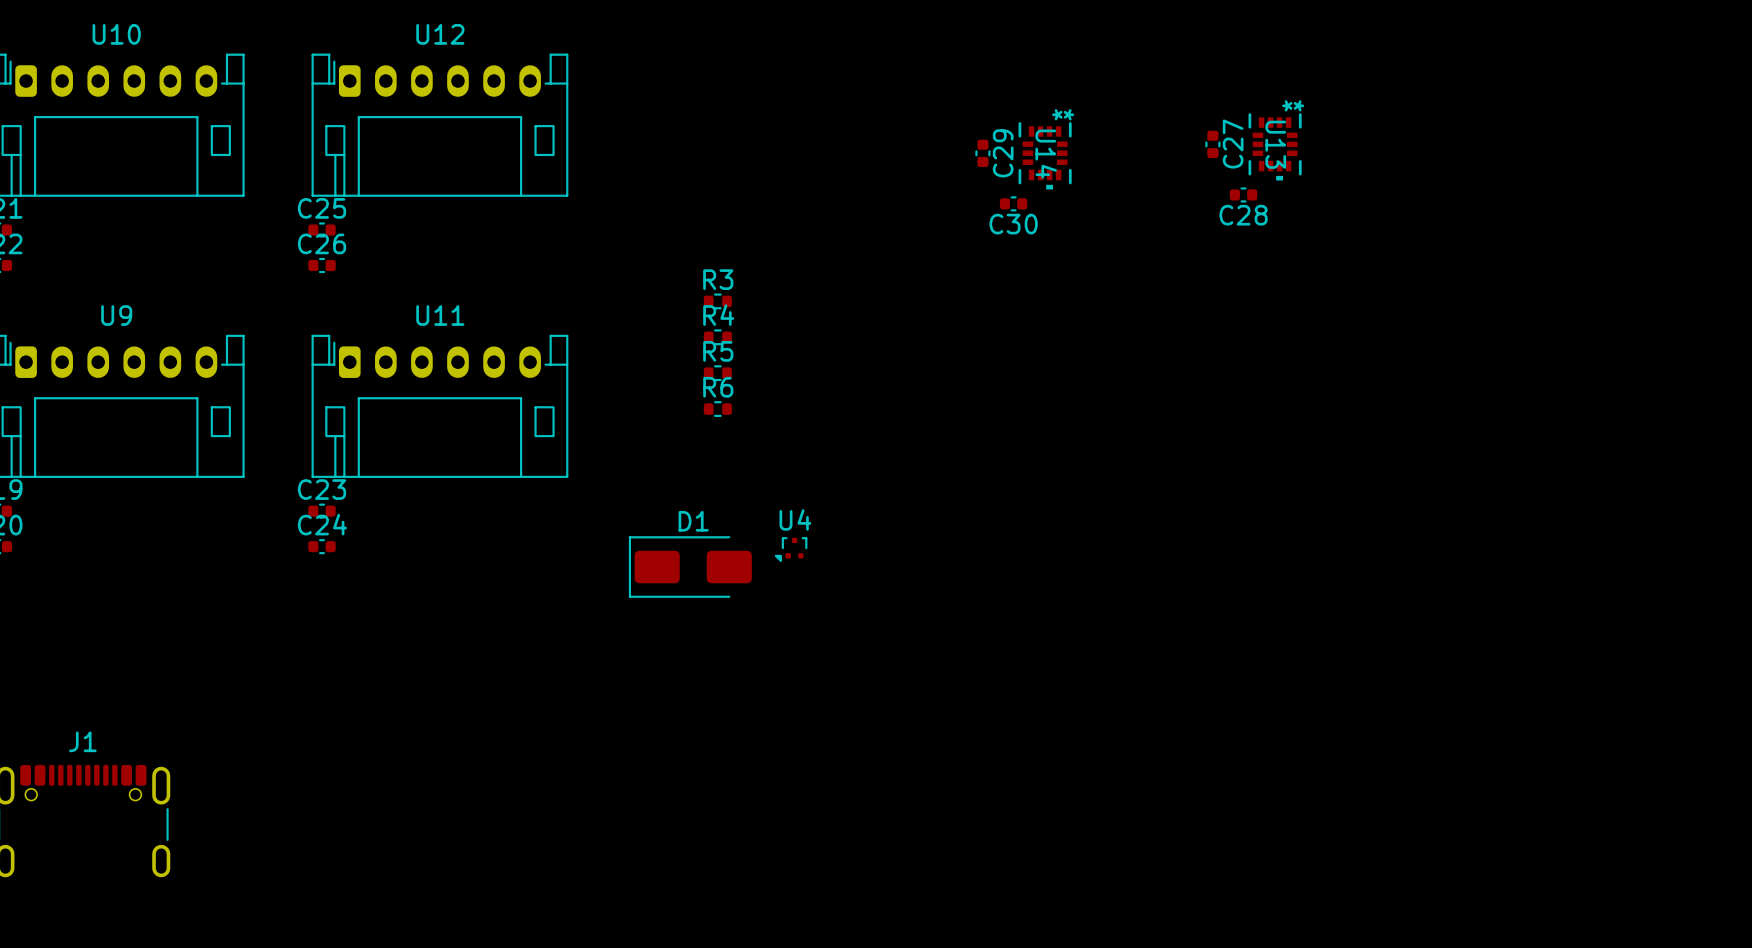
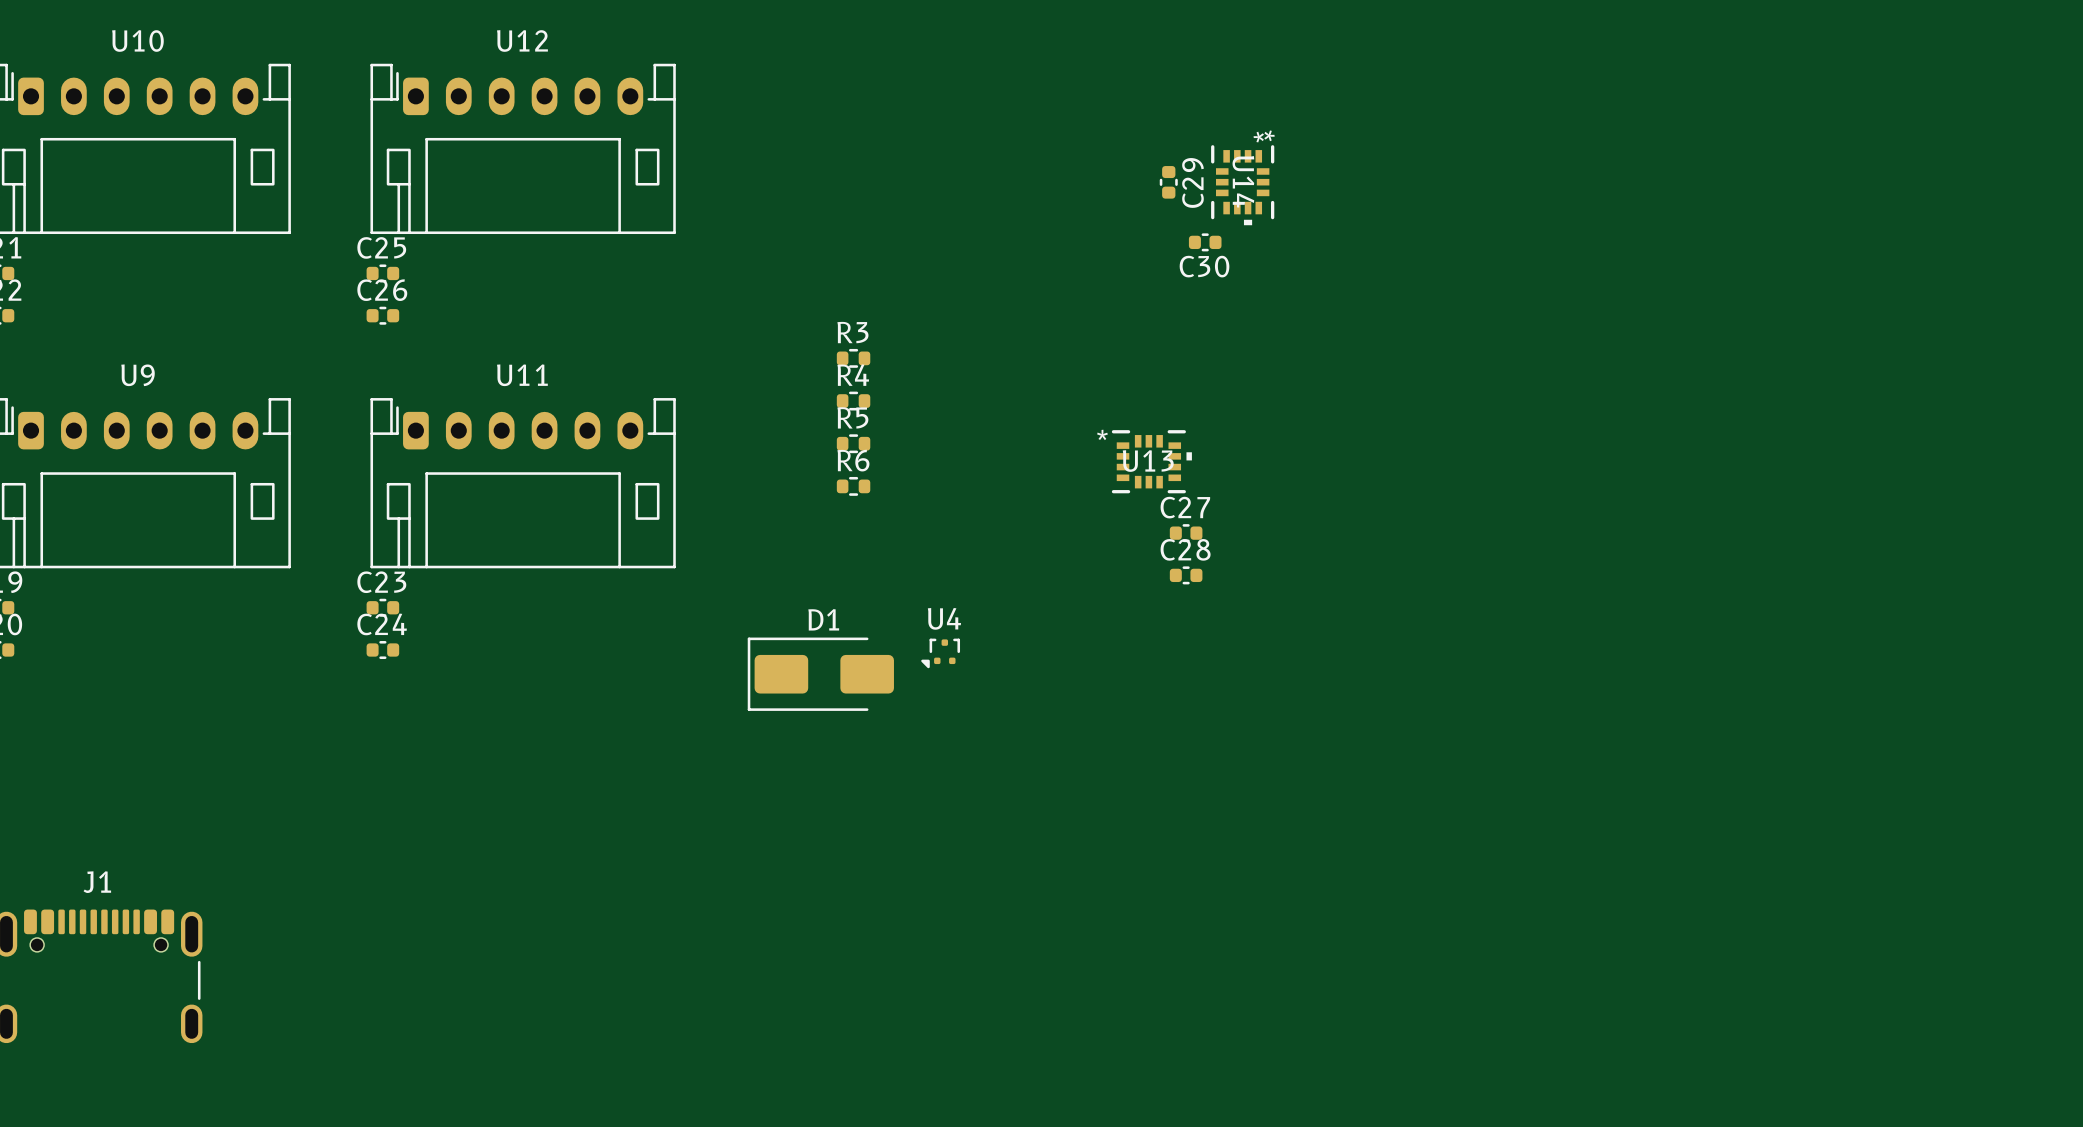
C27 rotation: 0° (1212, 144) -> 90° clockwise (1186, 533)
C27 position: (1212, 144) -> (1186, 533)
U13 rotation: 0° (1275, 146) -> 90° counterclockwise (1151, 461)
U13 position: (1275, 146) -> (1151, 461)
C28 position: (1243, 194) -> (1186, 575)
C28 name position: C28 (1243, 215) -> C28 (1185, 549)

